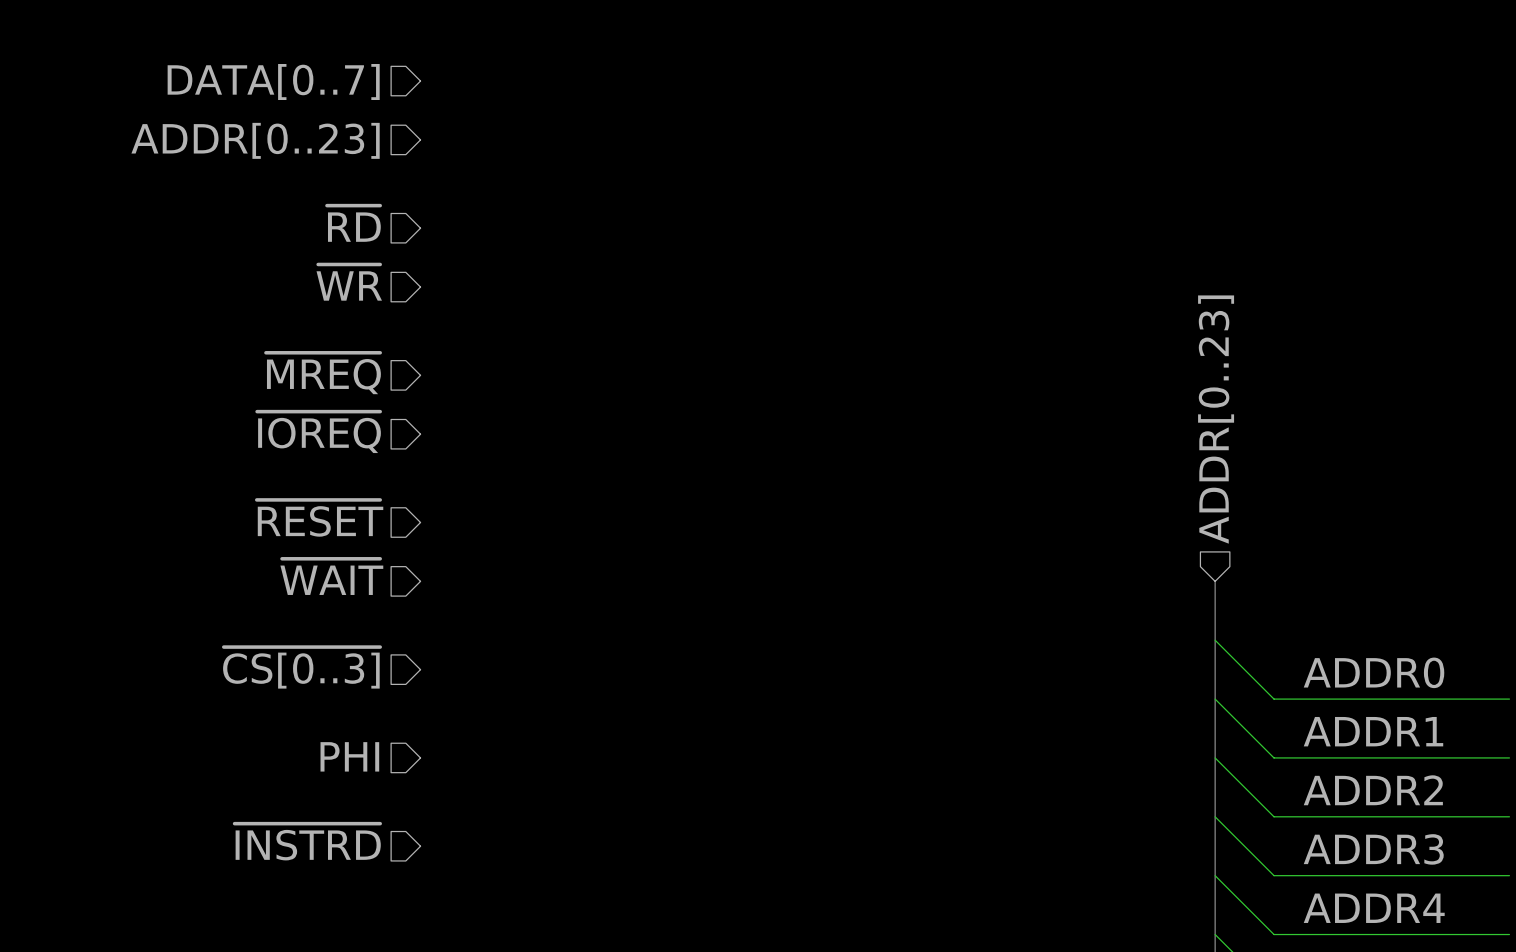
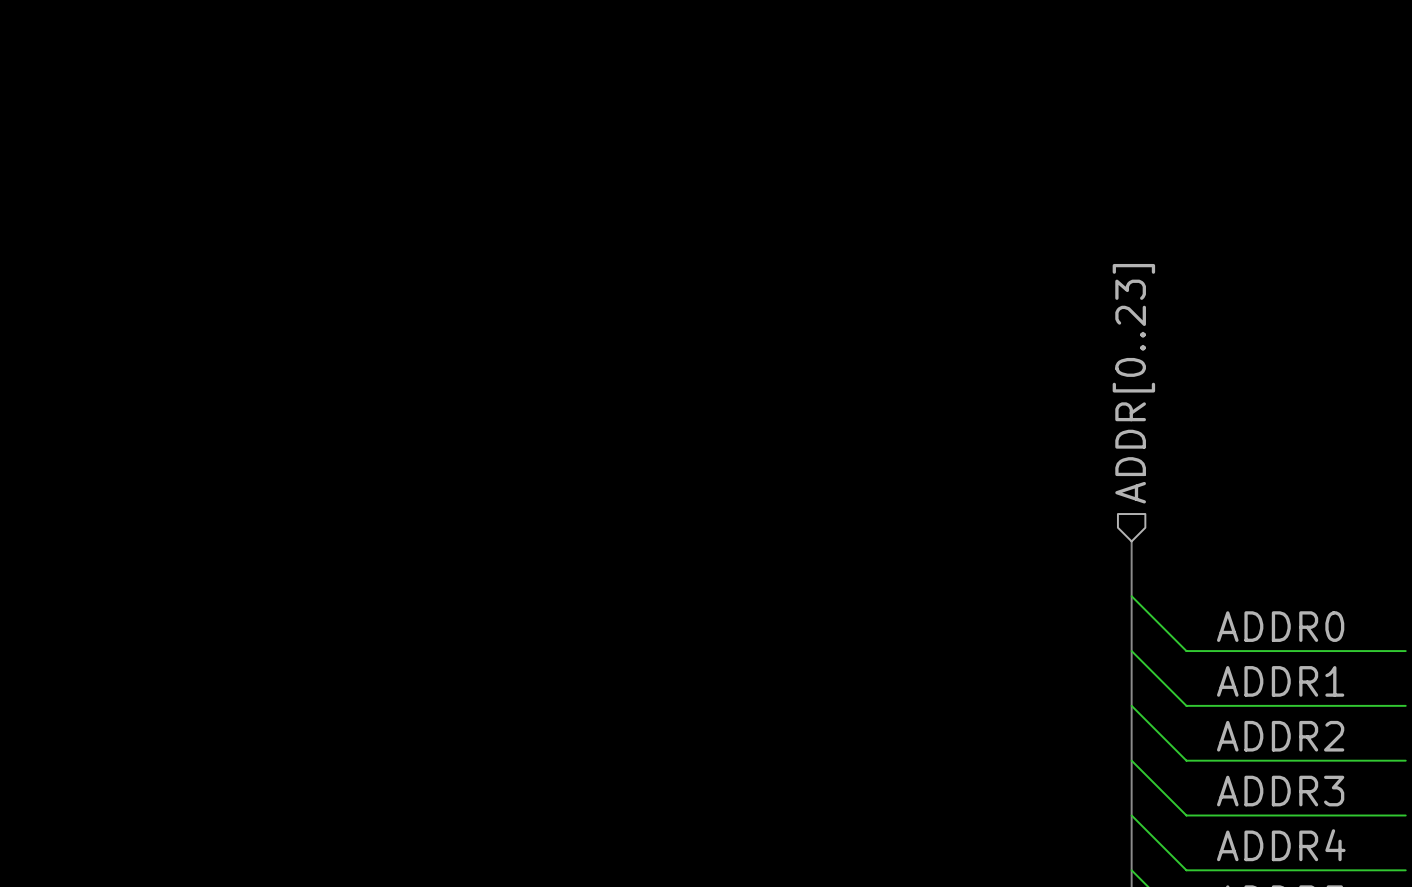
hierarchical label: DATA[0..7] (273, 82) -> none
hierarchical label: ADDR[0..23] (255, 140) -> none
hierarchical label: ~{RD} (353, 223) -> none
hierarchical label: ~{WR} (349, 282) -> none
hierarchical label: ~{MREQ} (323, 373) -> none
hierarchical label: ~{IOREQ} (318, 432) -> none
hierarchical label: ~{RESET} (320, 518) -> none
hierarchical label: ~{WAIT} (331, 576) -> none
hierarchical label: ~{CS[0..3]} (301, 667) -> none
hierarchical label: PHI (349, 756) -> none
hierarchical label: ~{INSTRD} (307, 842) -> none

